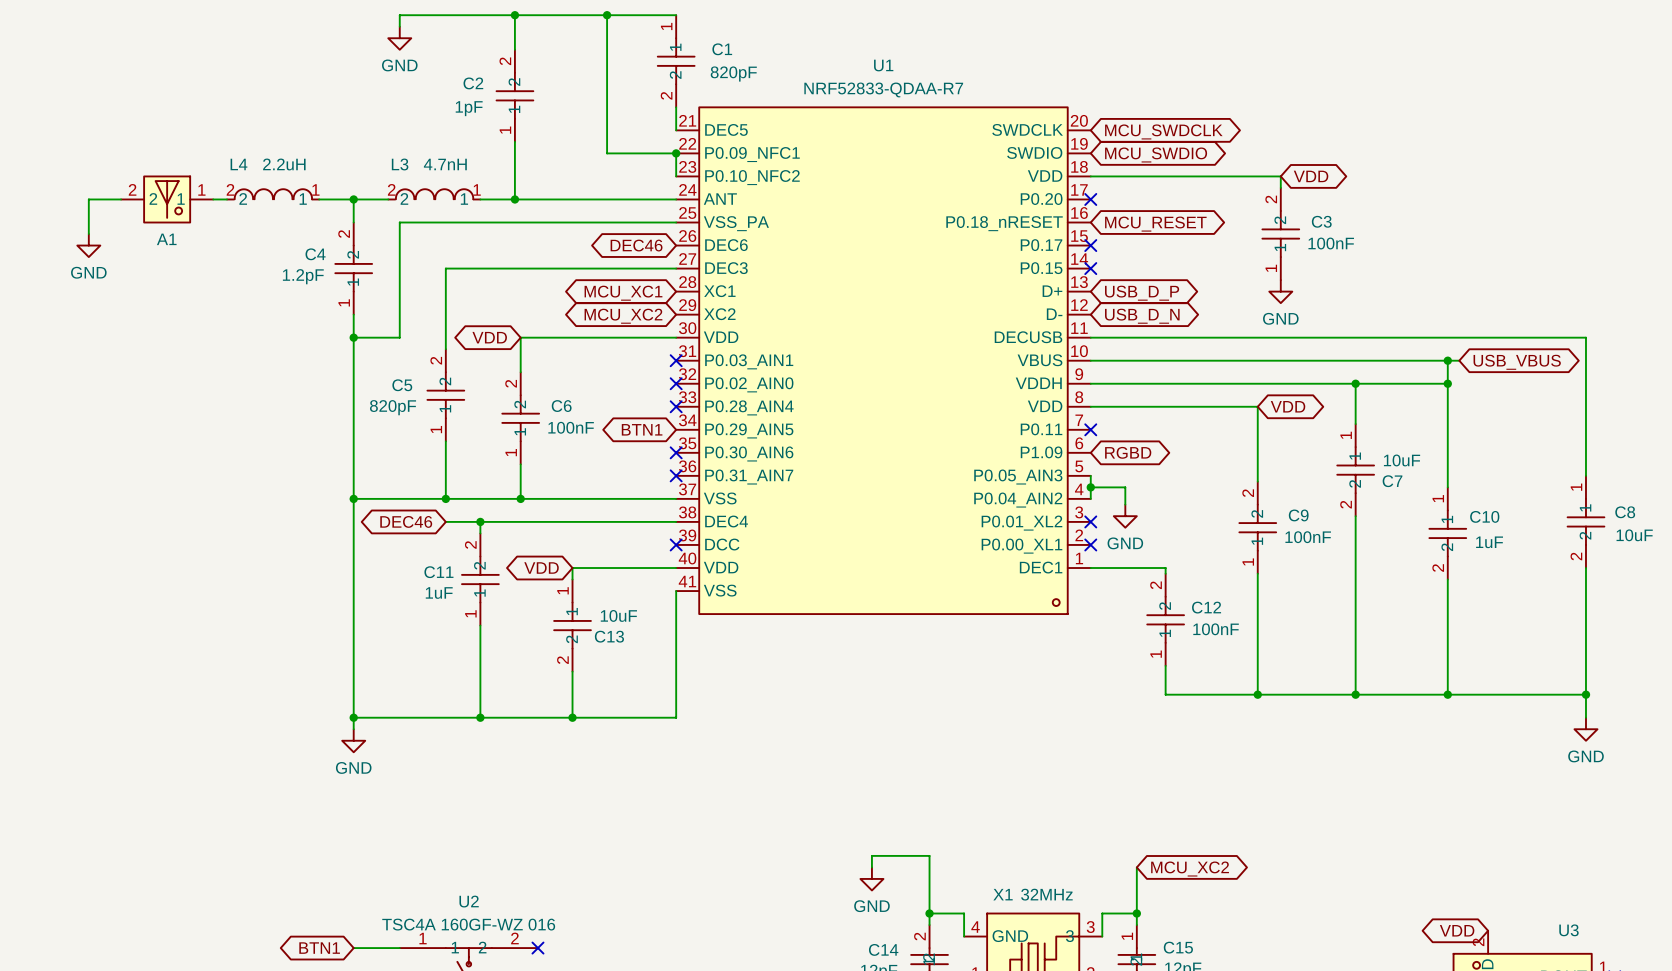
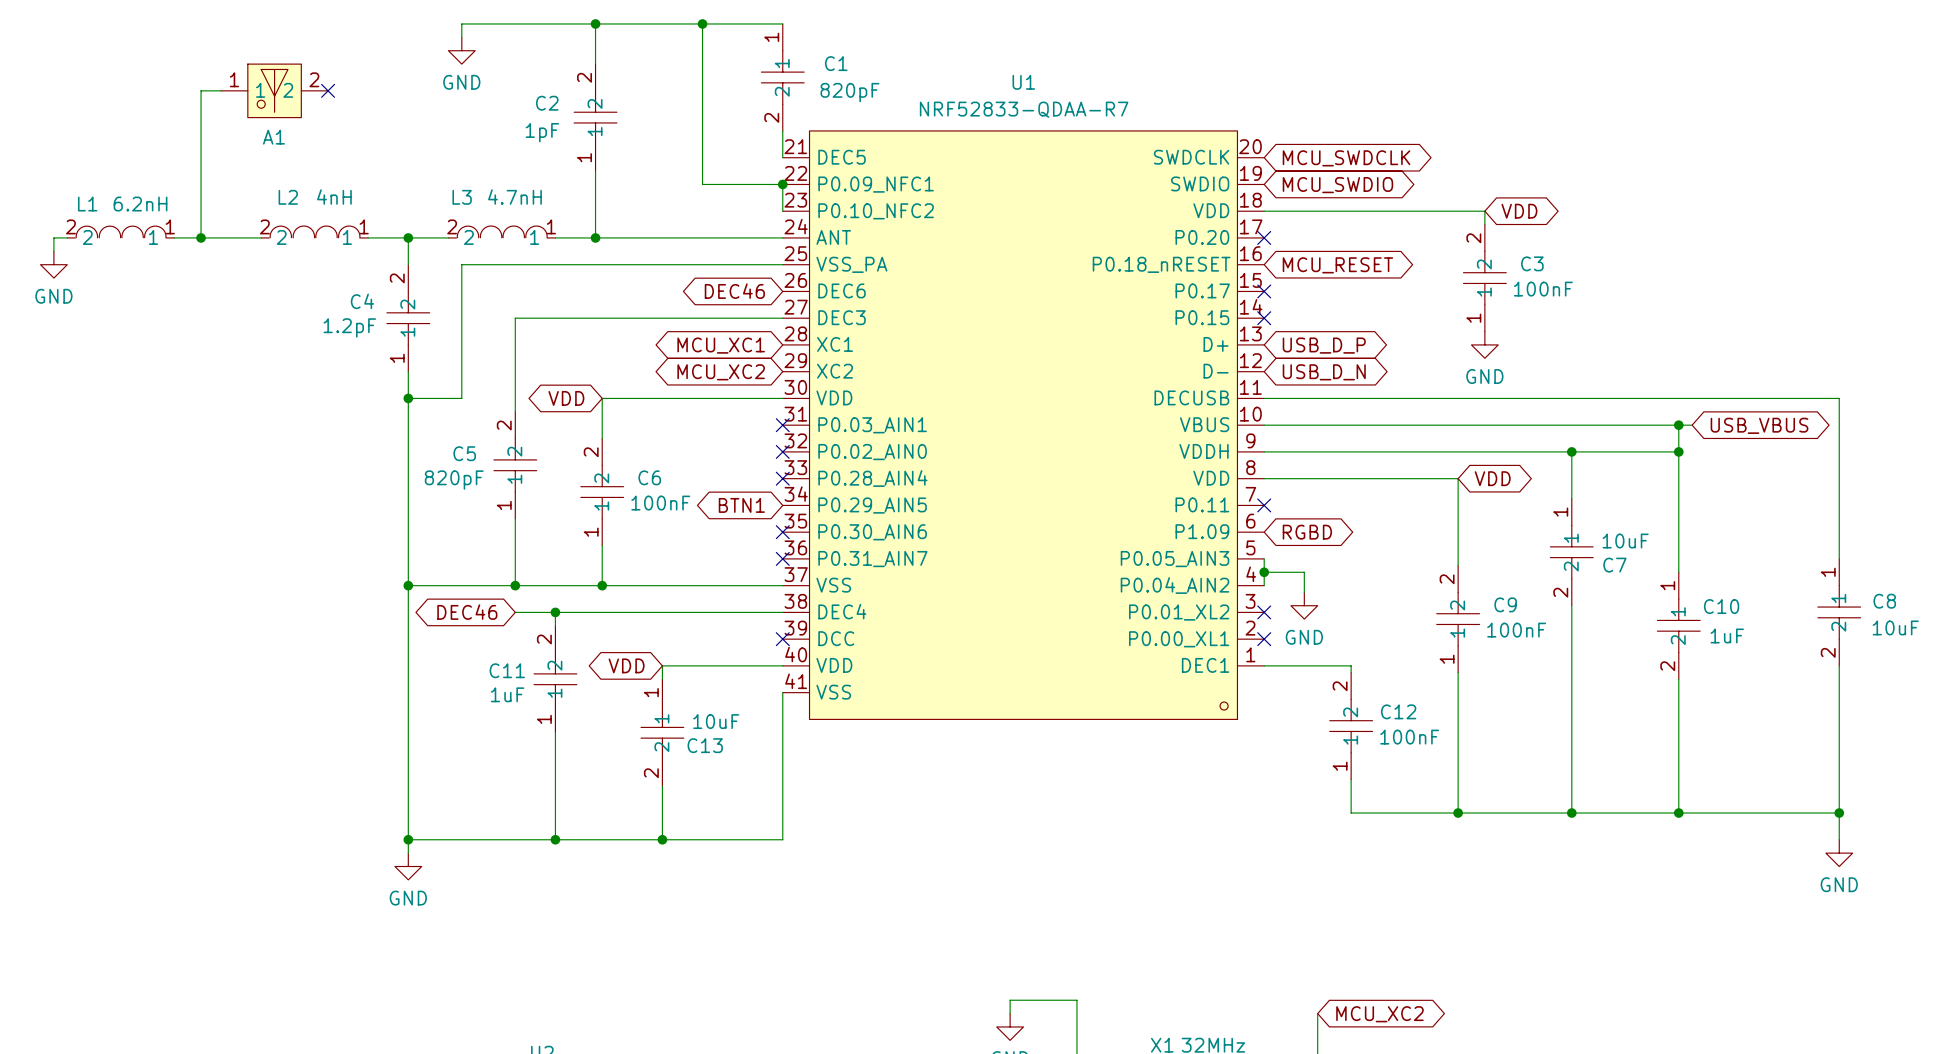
wire: none -> (221, 90) (201, 90) (201, 237)
no-connect mark: none -> (328, 90)
L4 name: L4 (238, 164) -> L2 (288, 197)
L4 text: 2.2uH (284, 164) -> 4nH (334, 197)
L1: none -> (120, 232)
wire: none -> (67, 237) (53, 237) (53, 251)
wire: (121, 199) (88, 199) (88, 234) -> none
A1 flip: as is (167, 199) -> left-right (274, 90)
A1 position: (167, 199) -> (274, 90)
junction: none -> (201, 237)
power symbol position: GND (88, 245) -> GND (53, 264)

